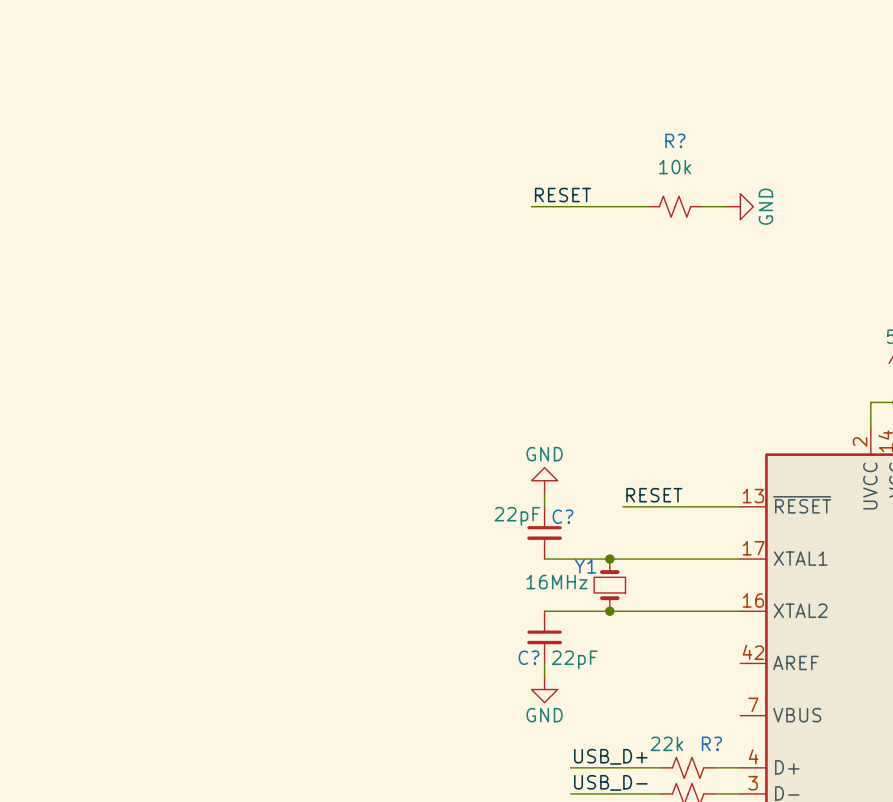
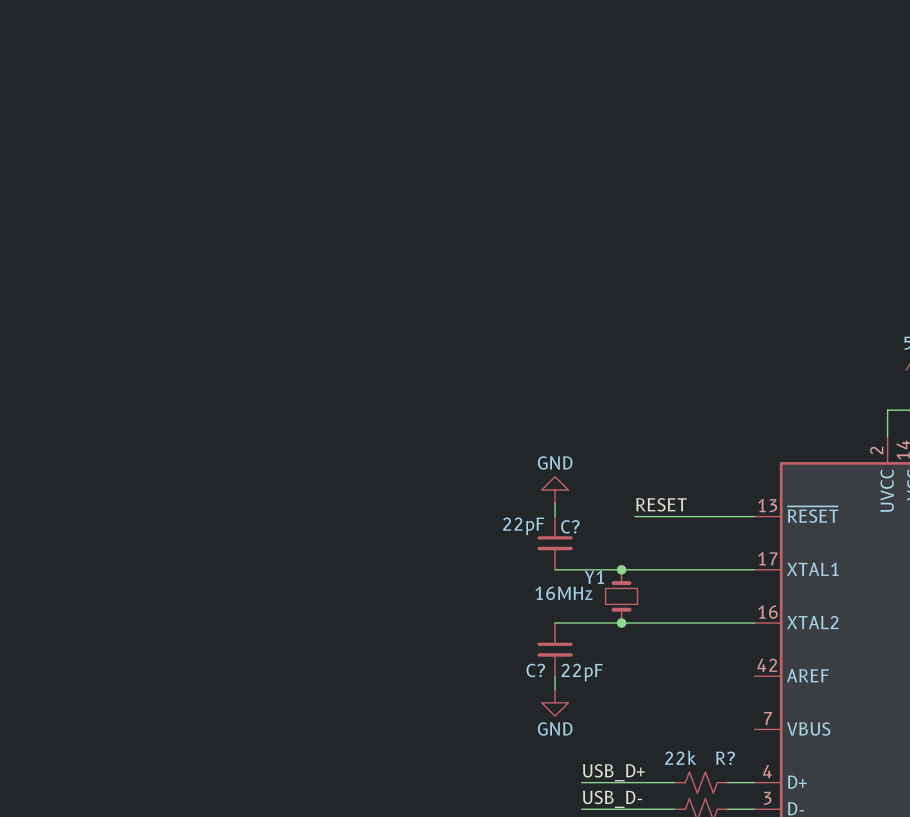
label: RESET (563, 195) -> none
wire: (531, 206) (648, 206) -> none
R?: 10k (675, 206) -> none
wire: (701, 206) (727, 206) -> none
power symbol: GND (740, 206) -> none

